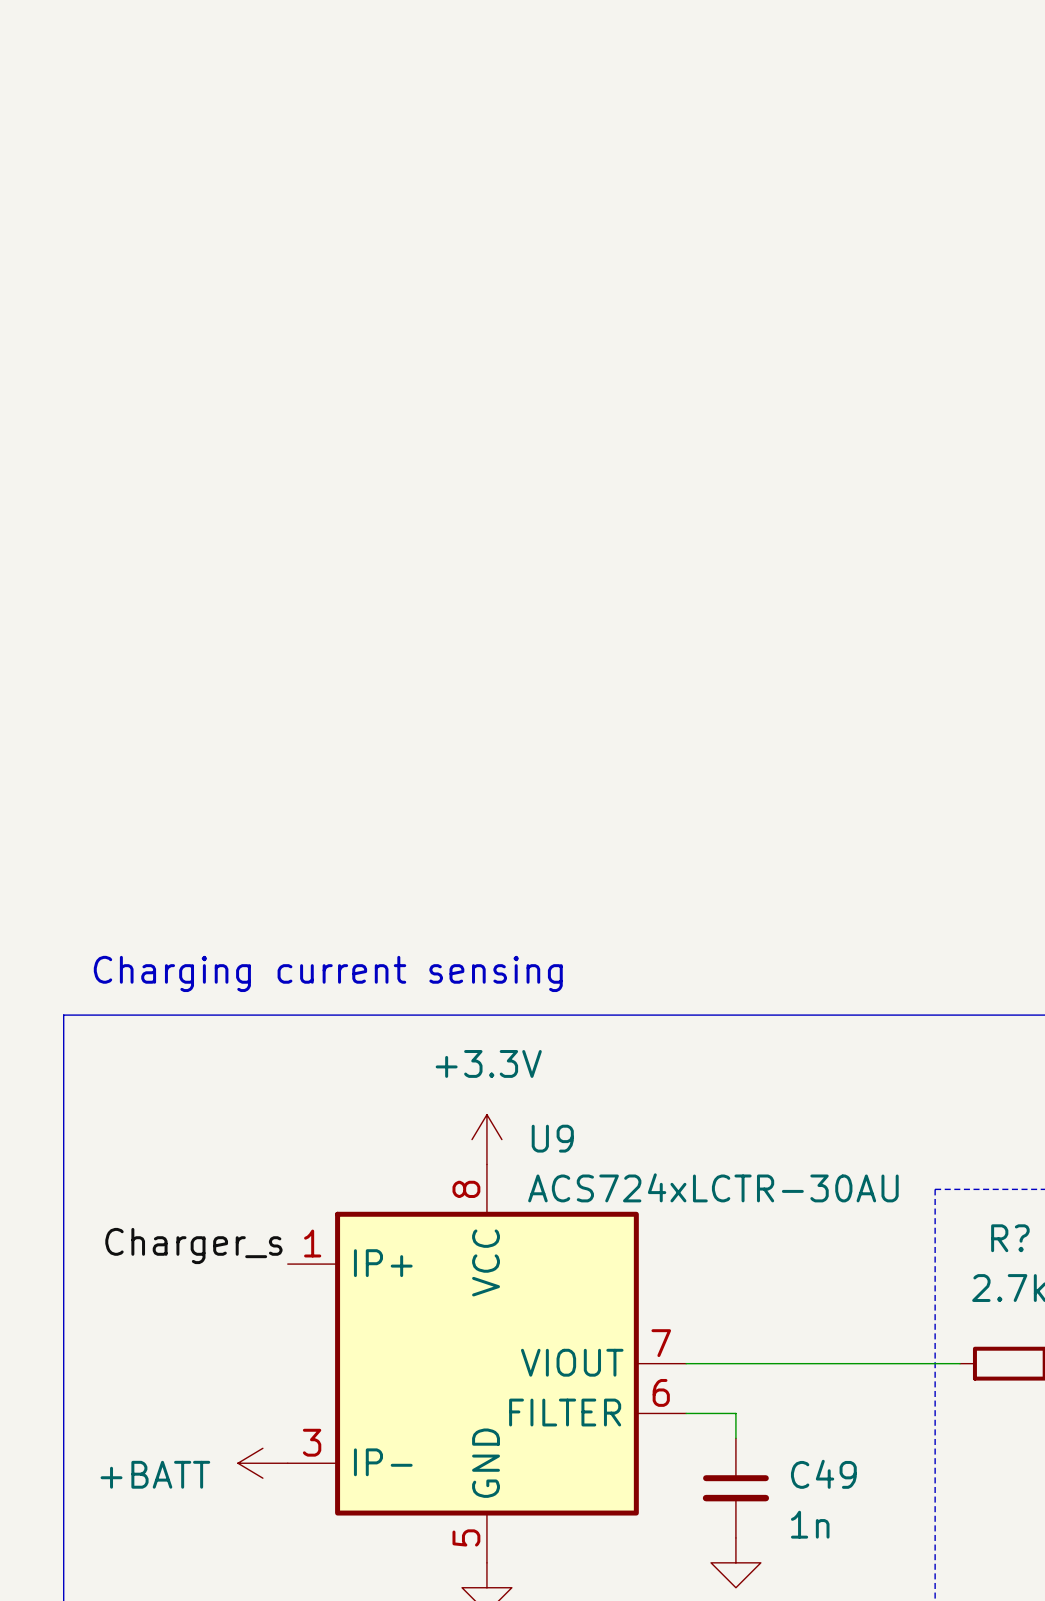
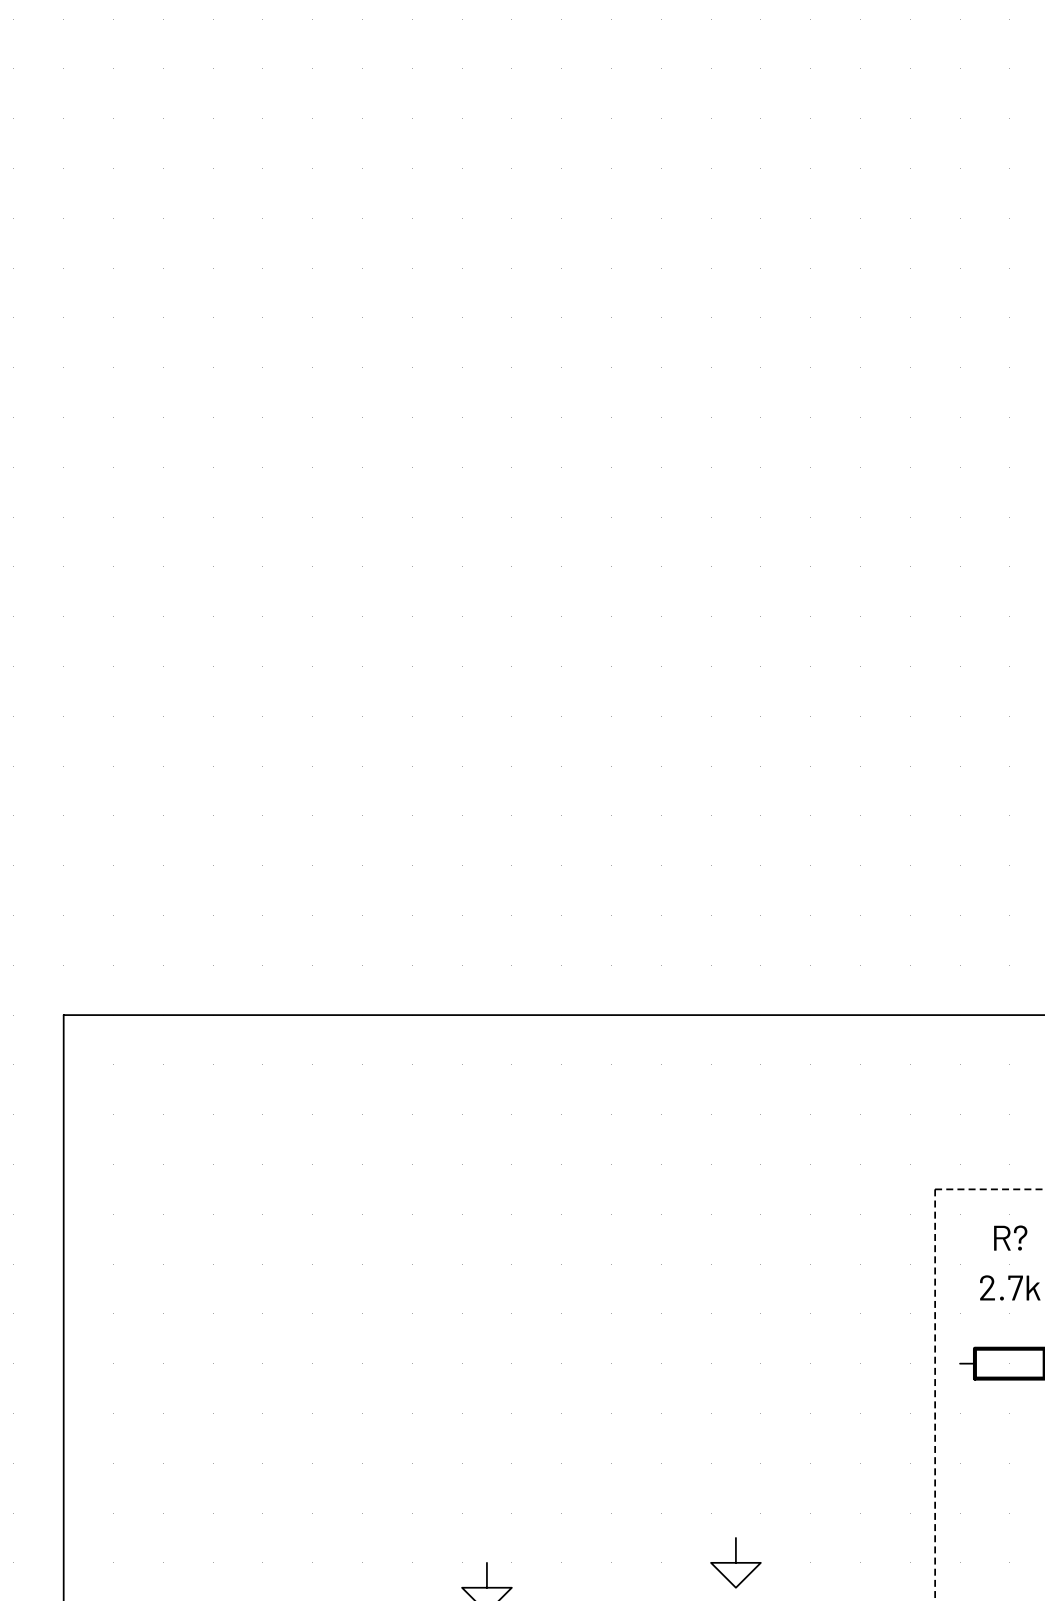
text: Charging current sensing (328, 973) -> none
power symbol: +3.3V (486, 1139) -> none
label: Charger_s (193, 1246) -> none
U9: ACS724xLCTR-30AU (486, 1363) -> none
wire: (686, 1363) (960, 1363) -> none
wire: (686, 1413) (735, 1413) (735, 1438) -> none
power symbol: +BATT (262, 1463) -> none
C49: 1n (735, 1488) -> none

